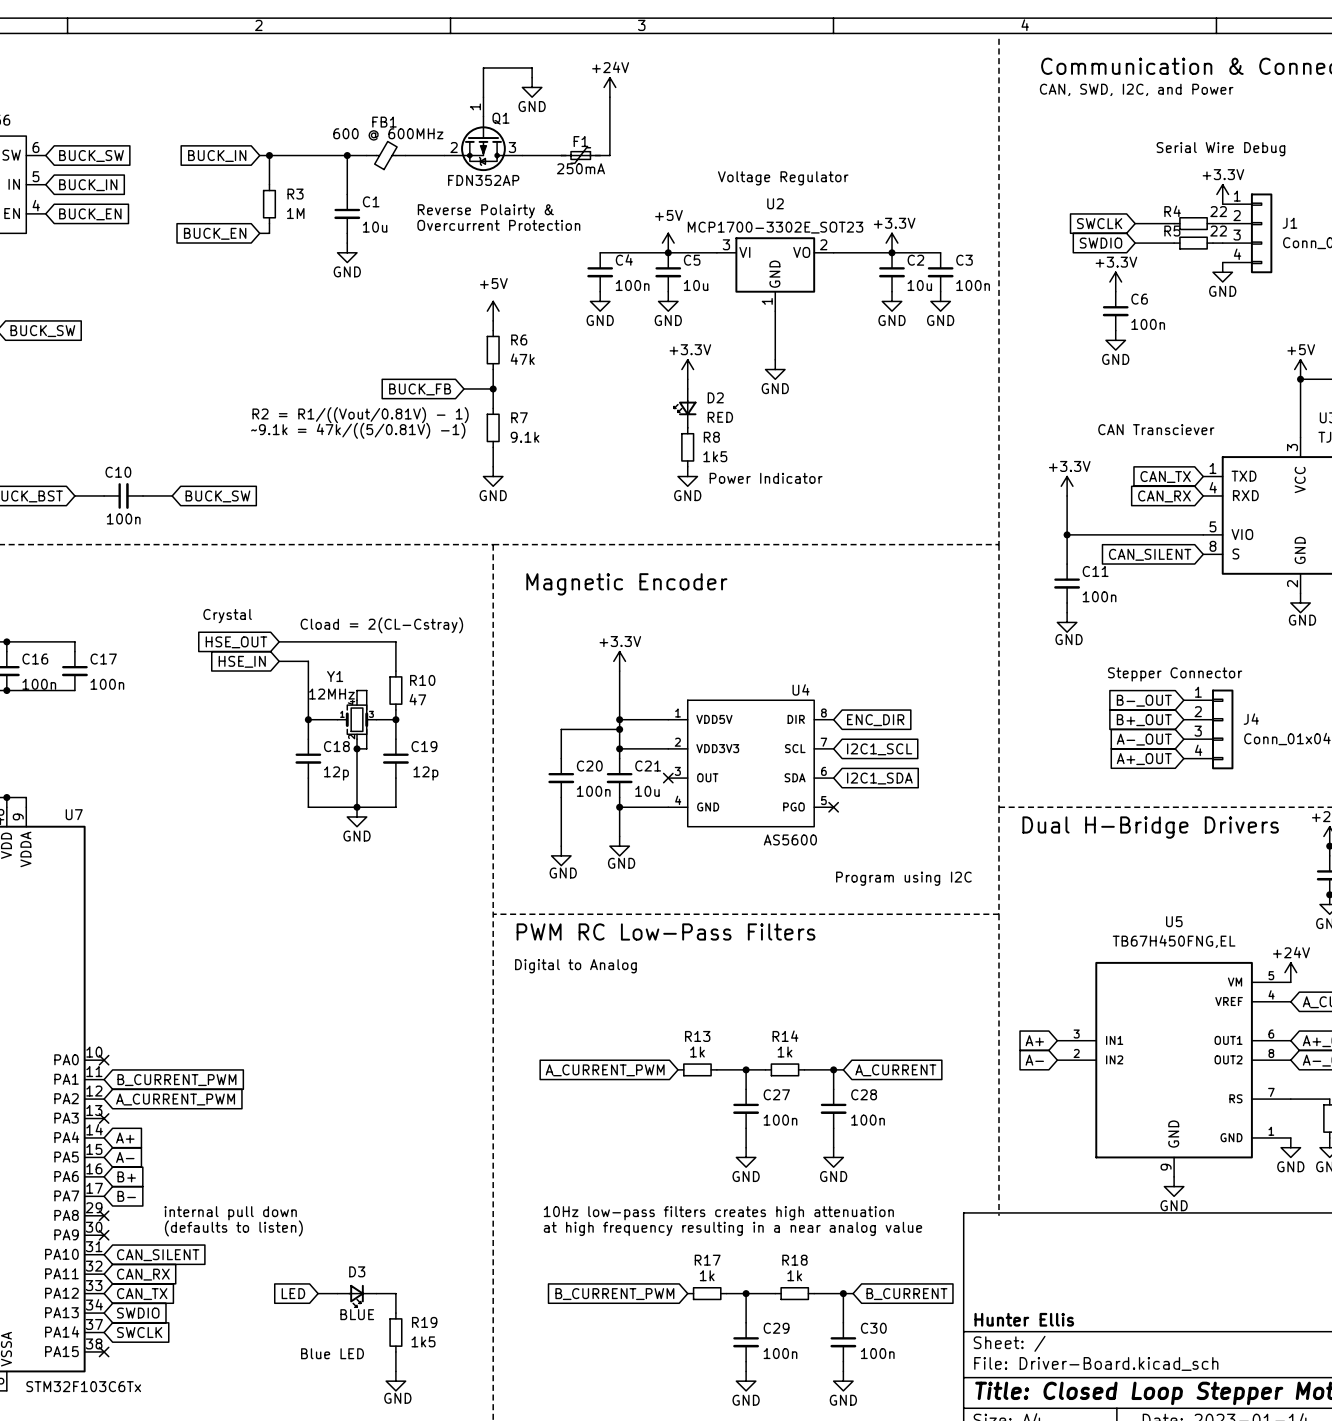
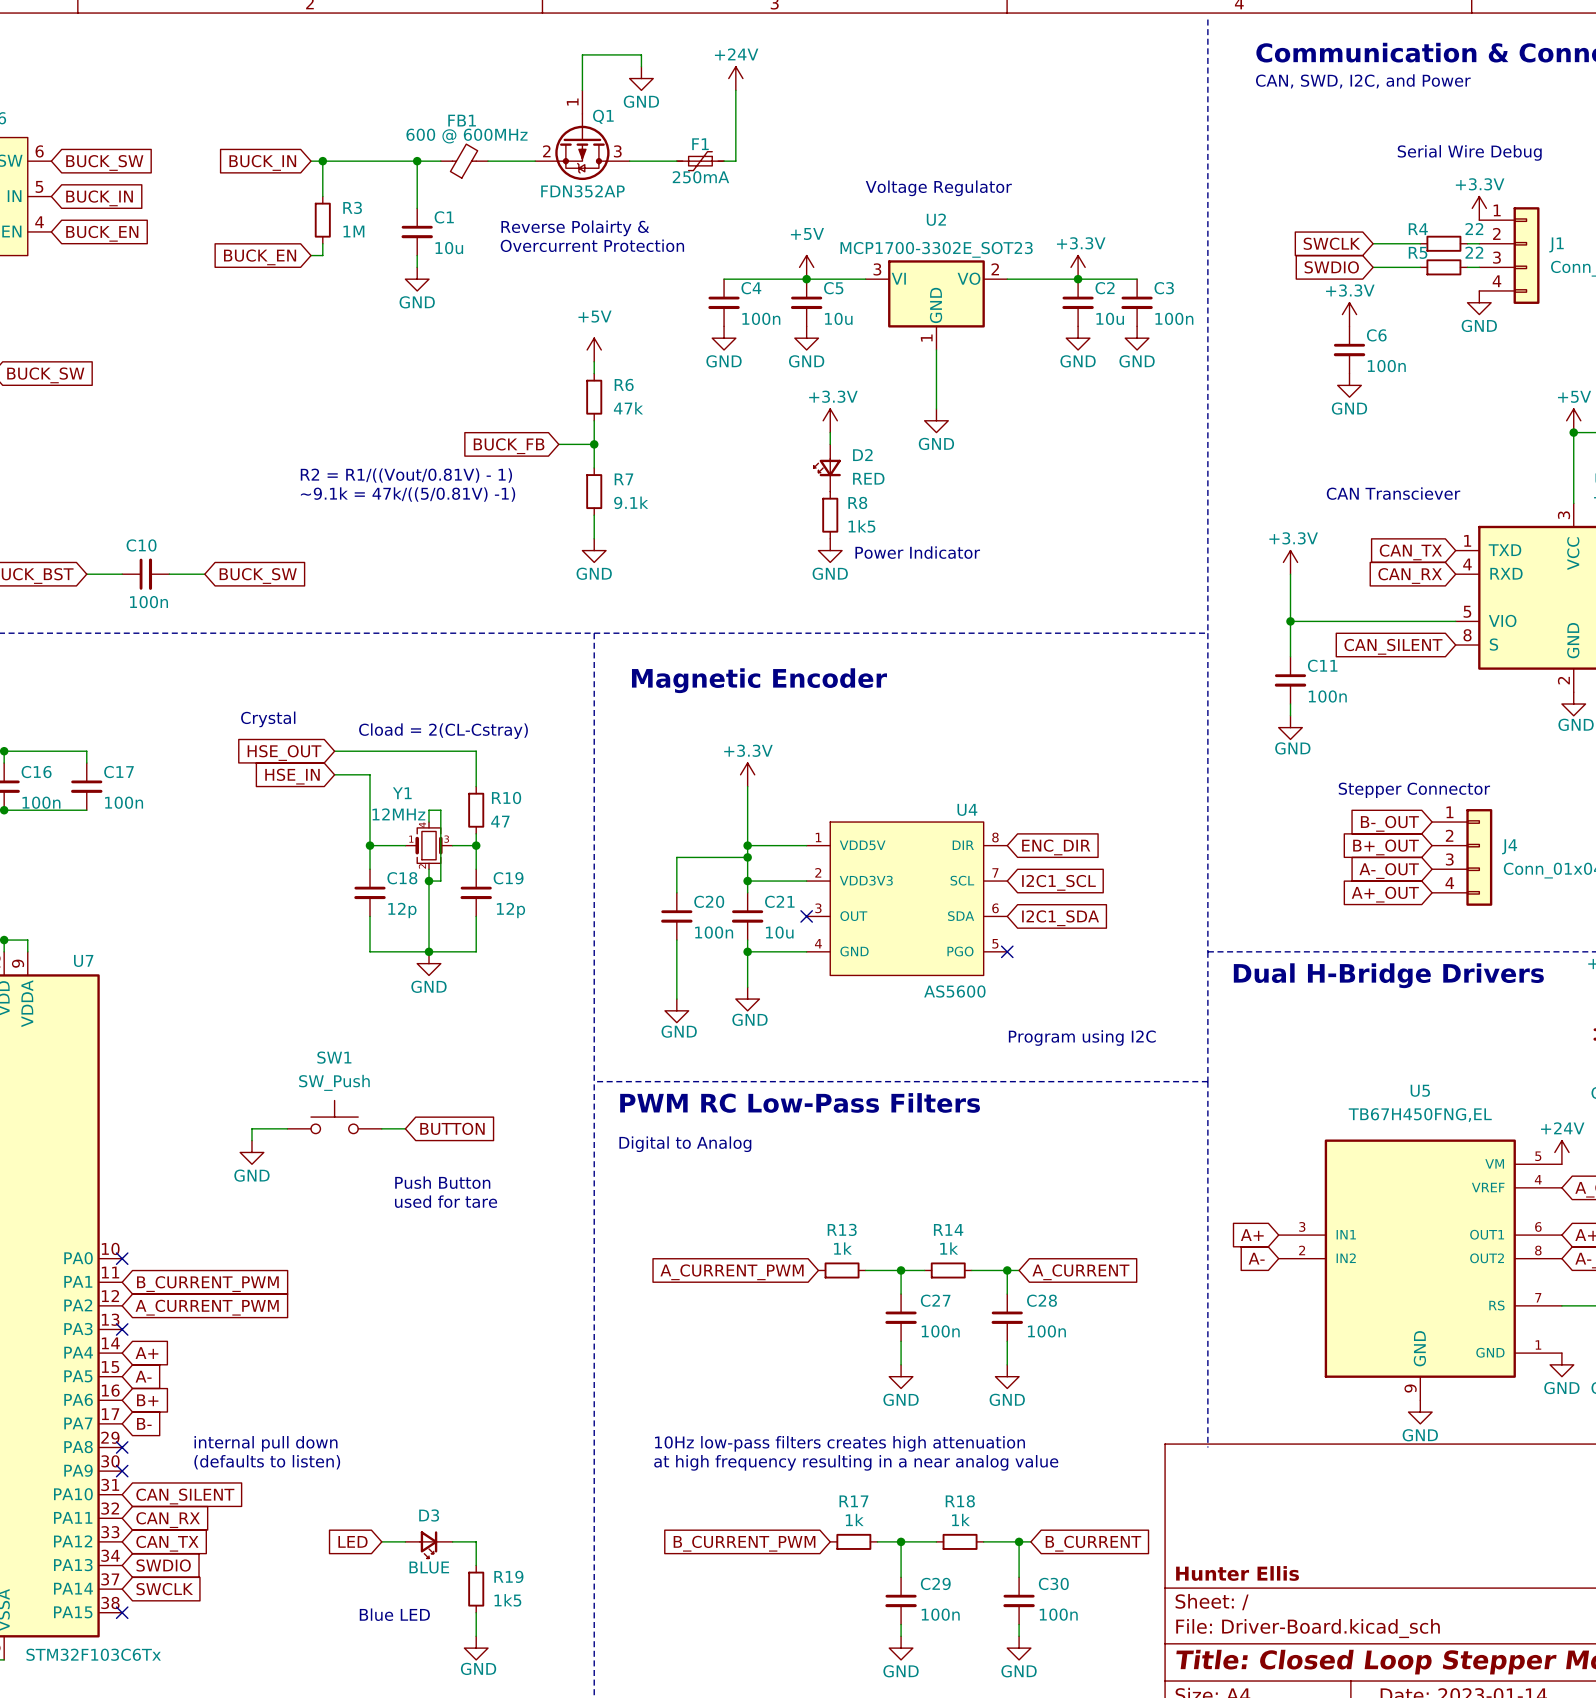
SW1: none -> SW_Push (334, 1117)
wire: none -> (287, 1128) (251, 1128) (251, 1140)
wire: none -> (381, 1128) (405, 1128)
global label: none -> BUTTON (452, 1128)
power symbol: none -> GND (251, 1152)
text: none -> Push Button (442, 1182)
text: none -> used for tare (446, 1201)

